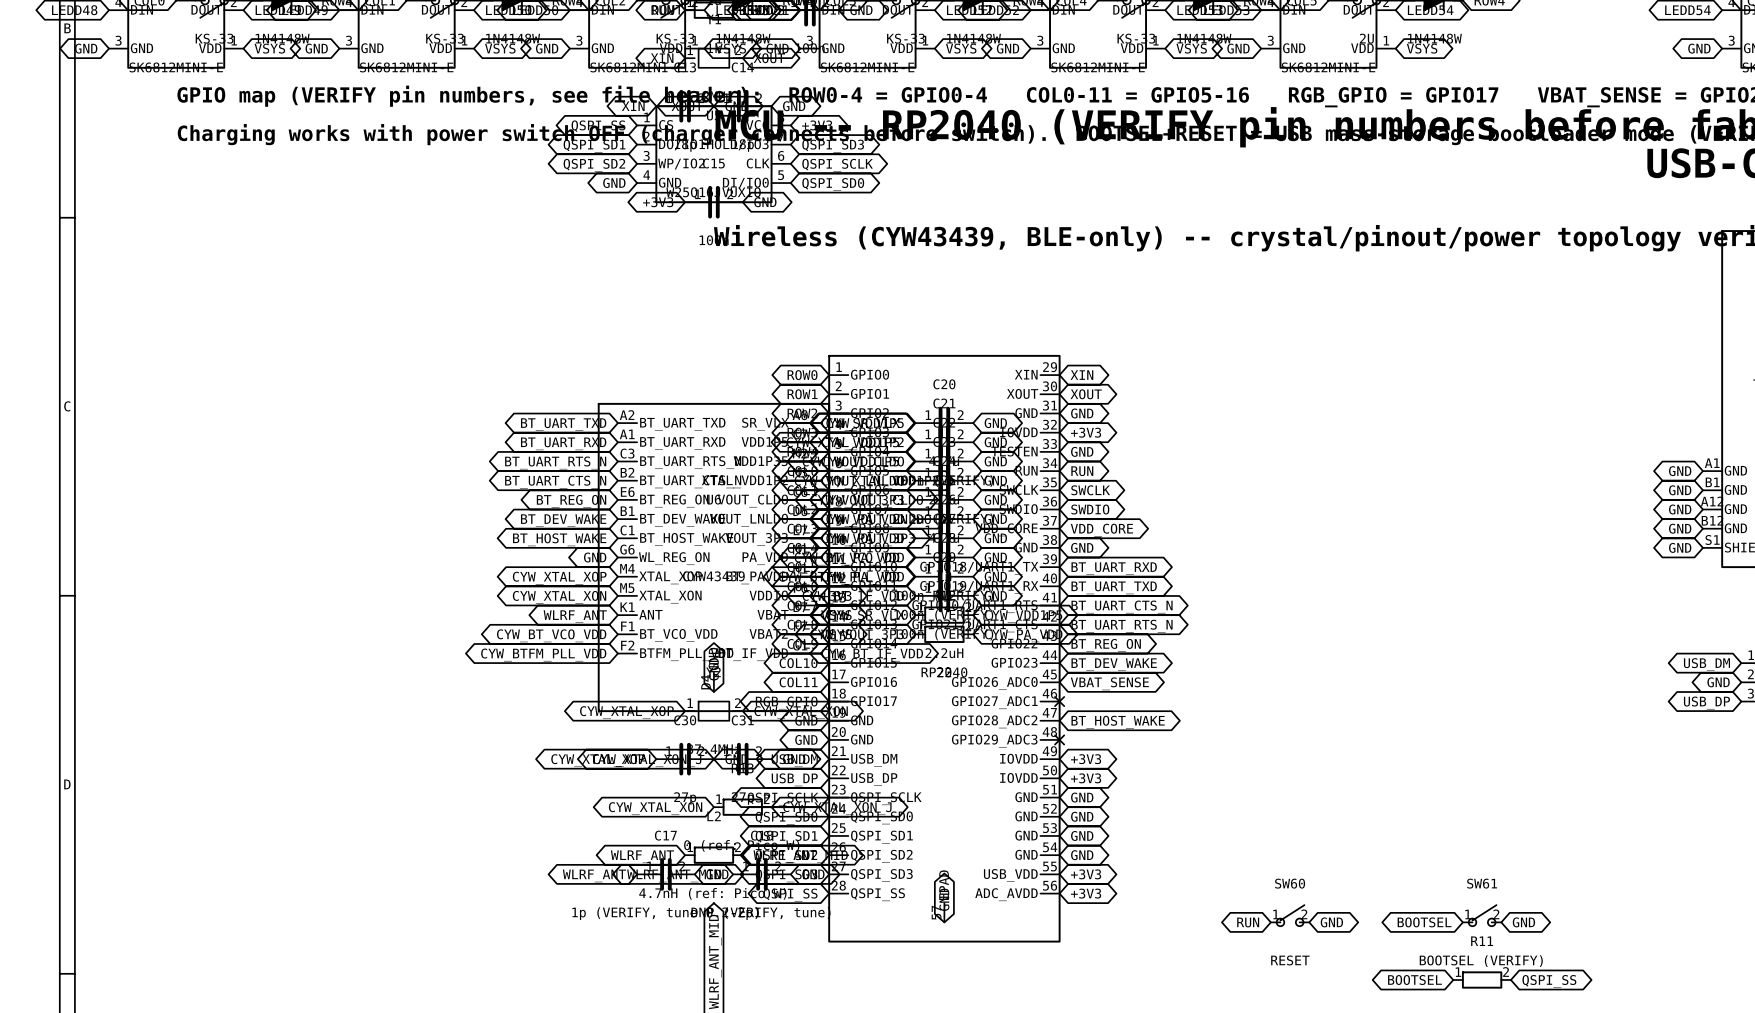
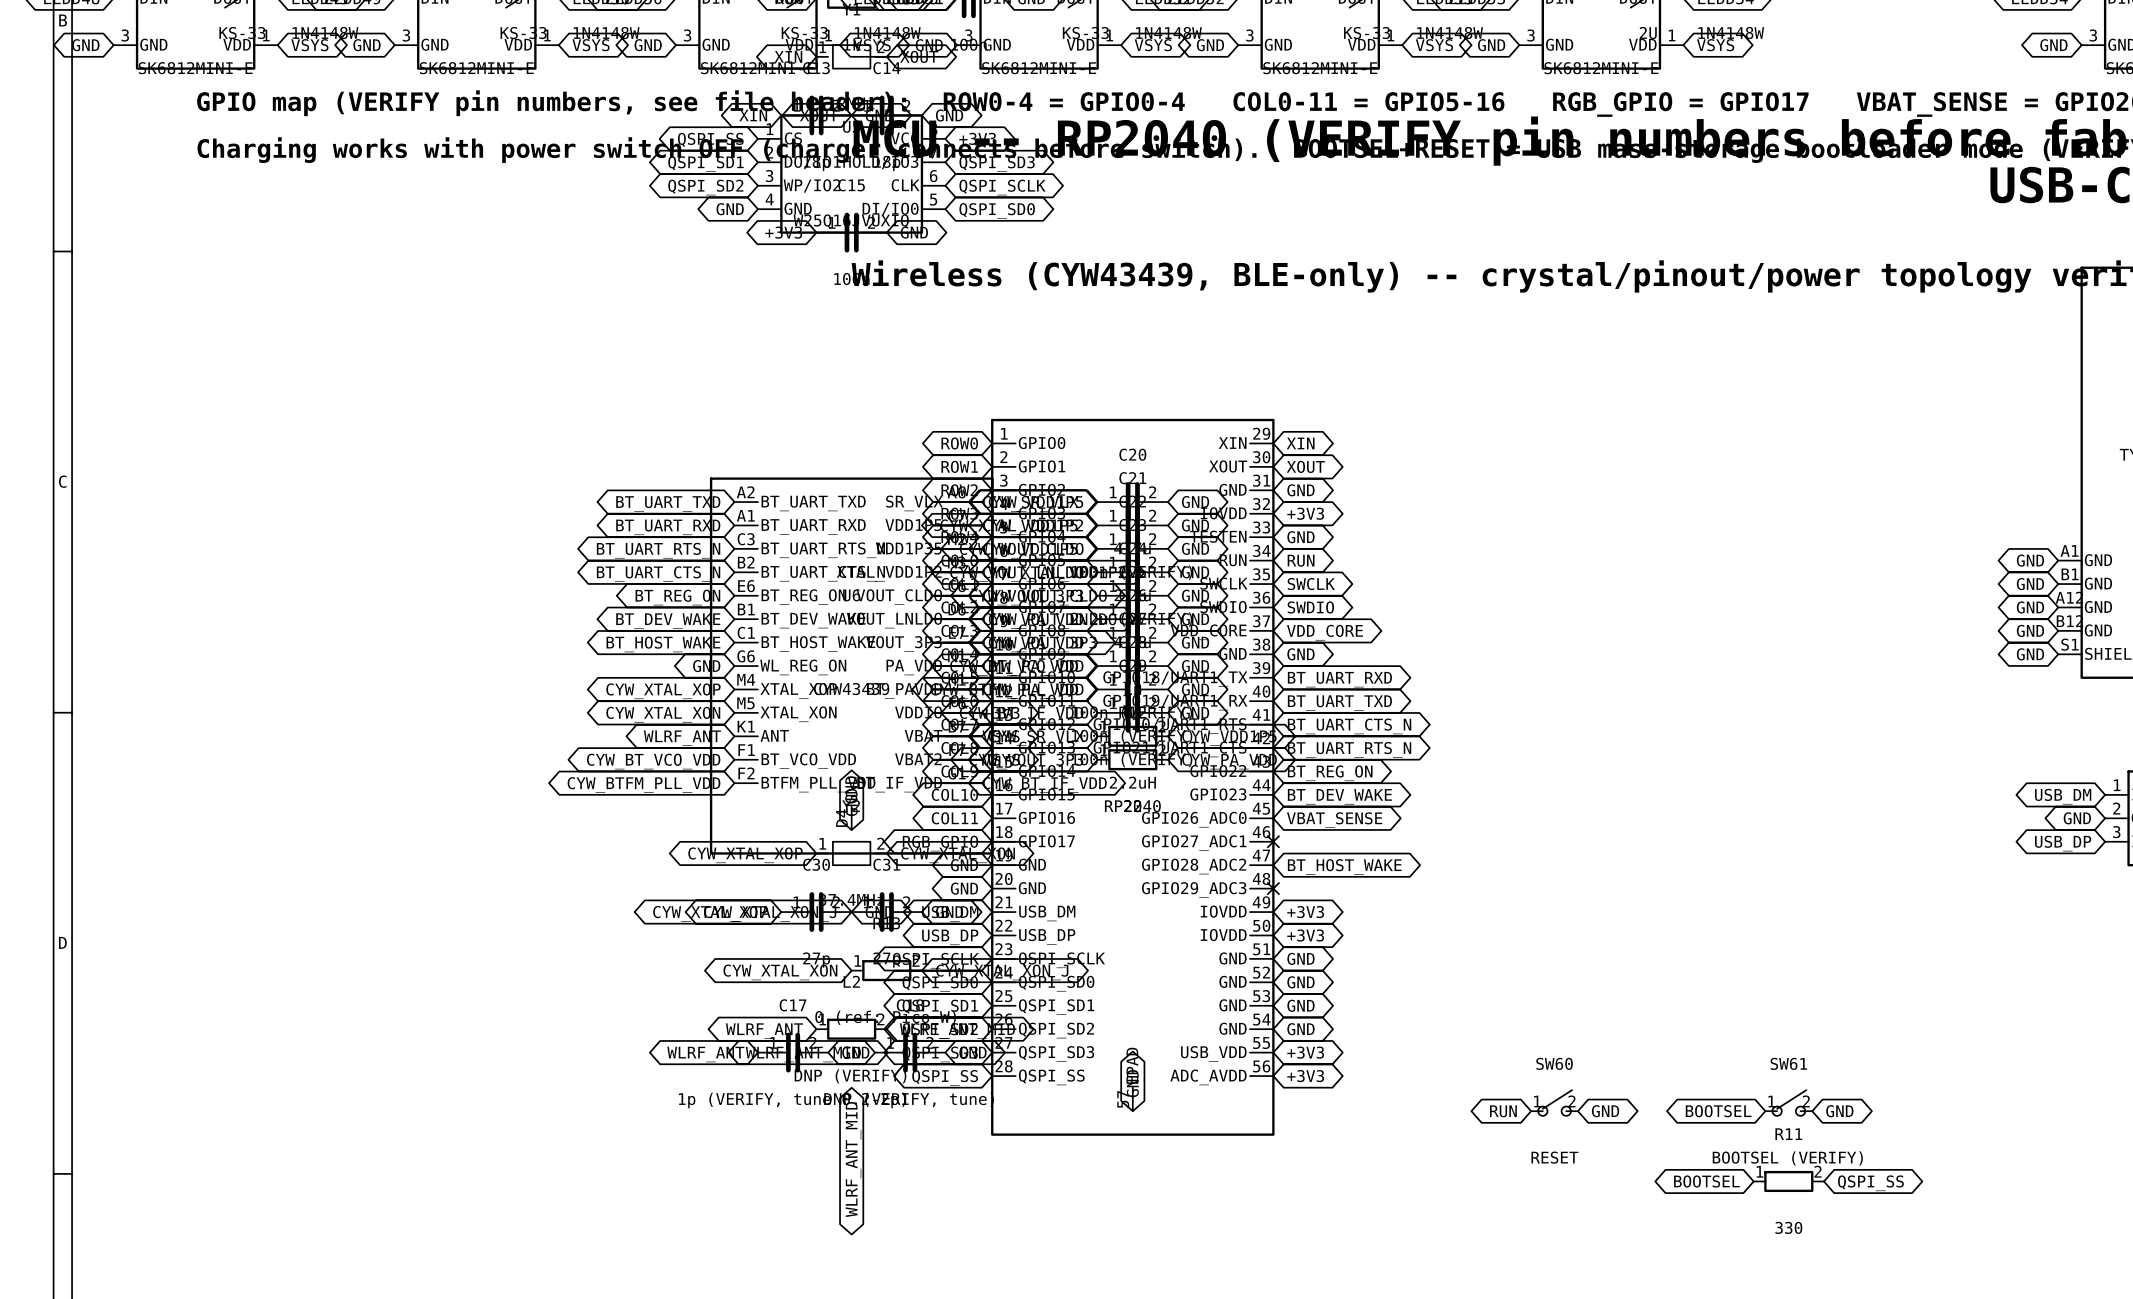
L2 value: 4.7nH (ref: Pico W) (712, 893) -> DNP (VERIFY) (850, 1076)

